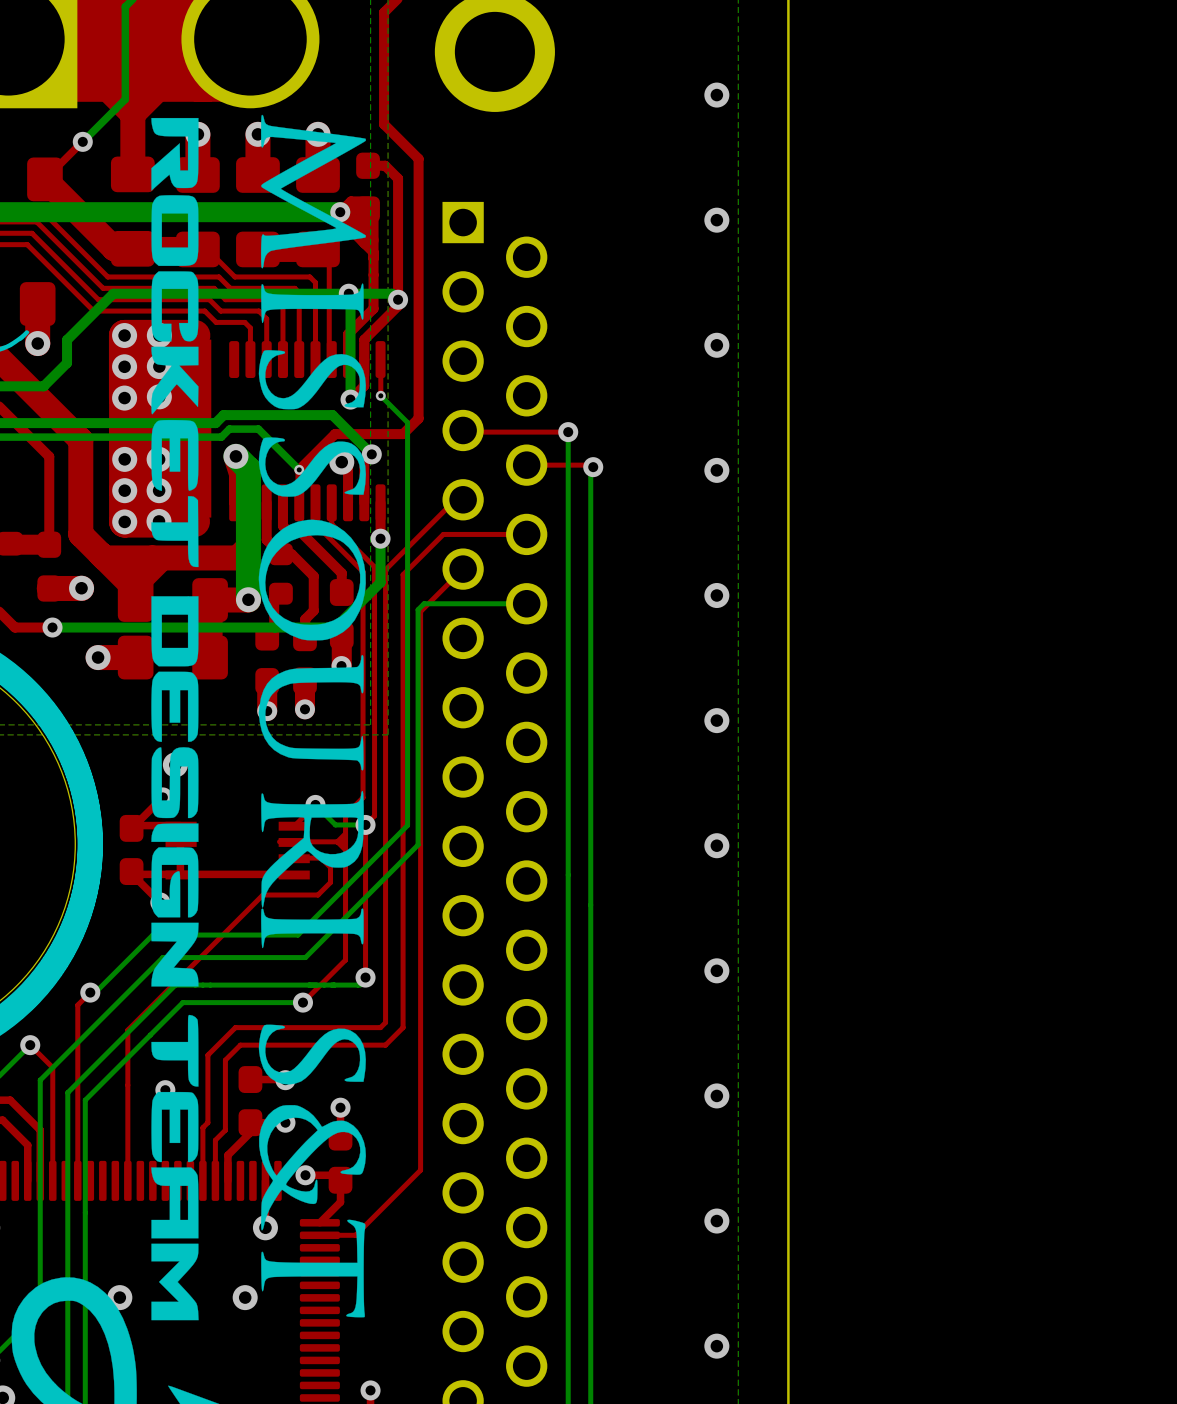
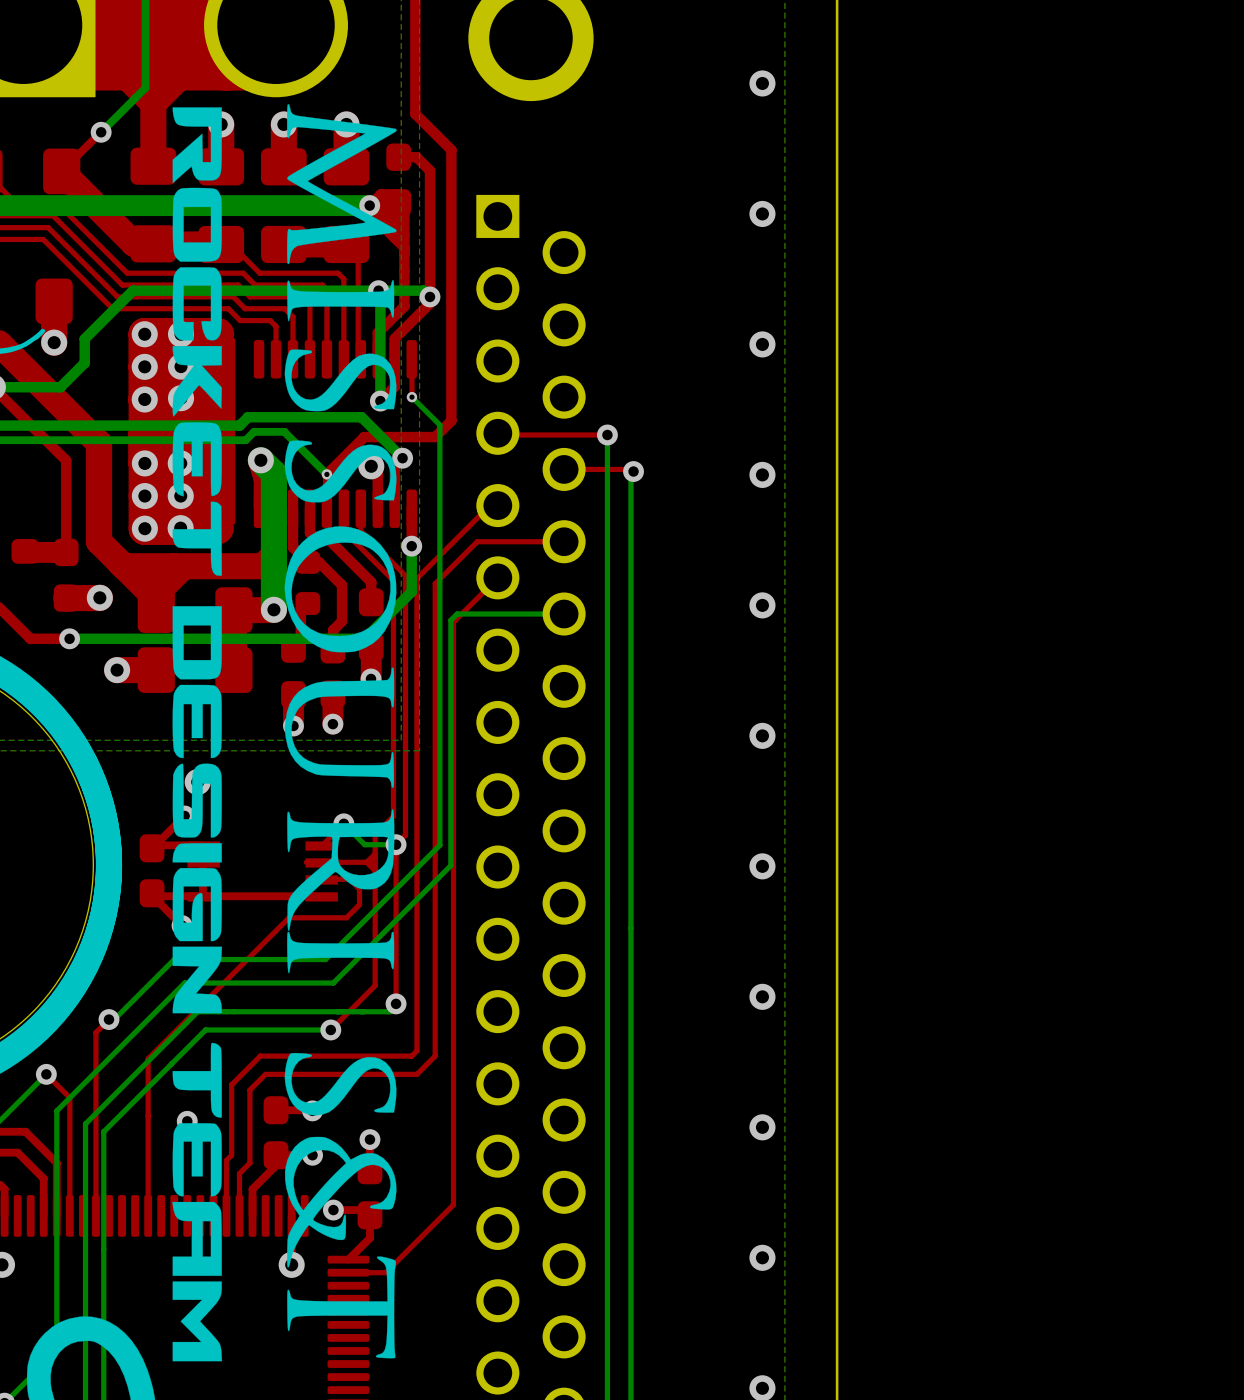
via: (119, 1297) -> none
via: (245, 1297) -> none

